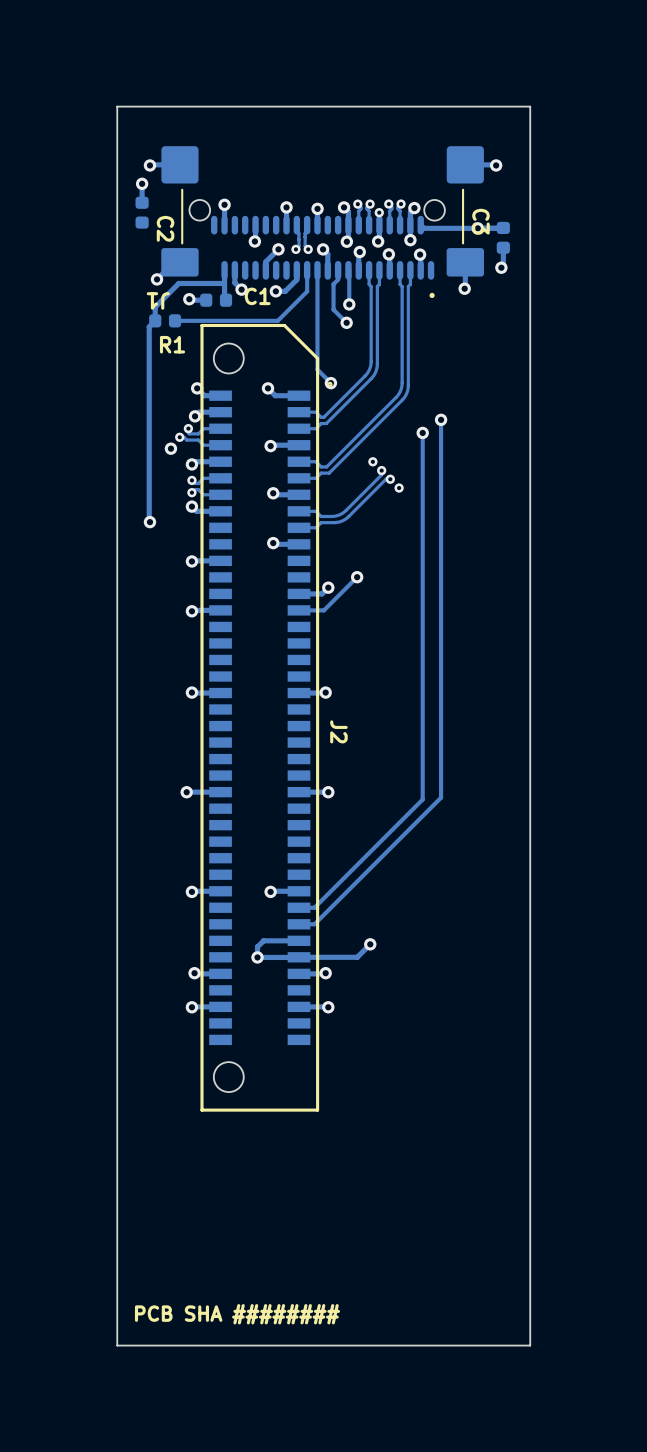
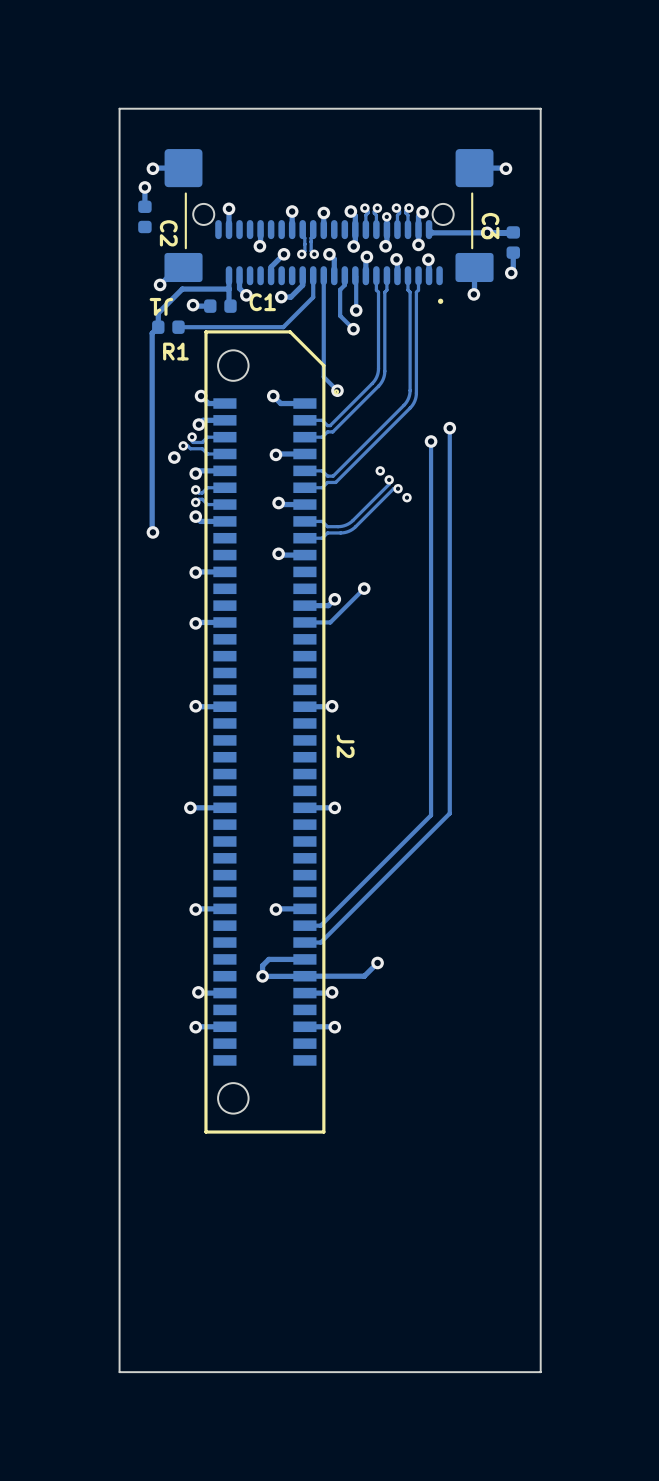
text: PCB SHA ######## (237, 1314) -> none

